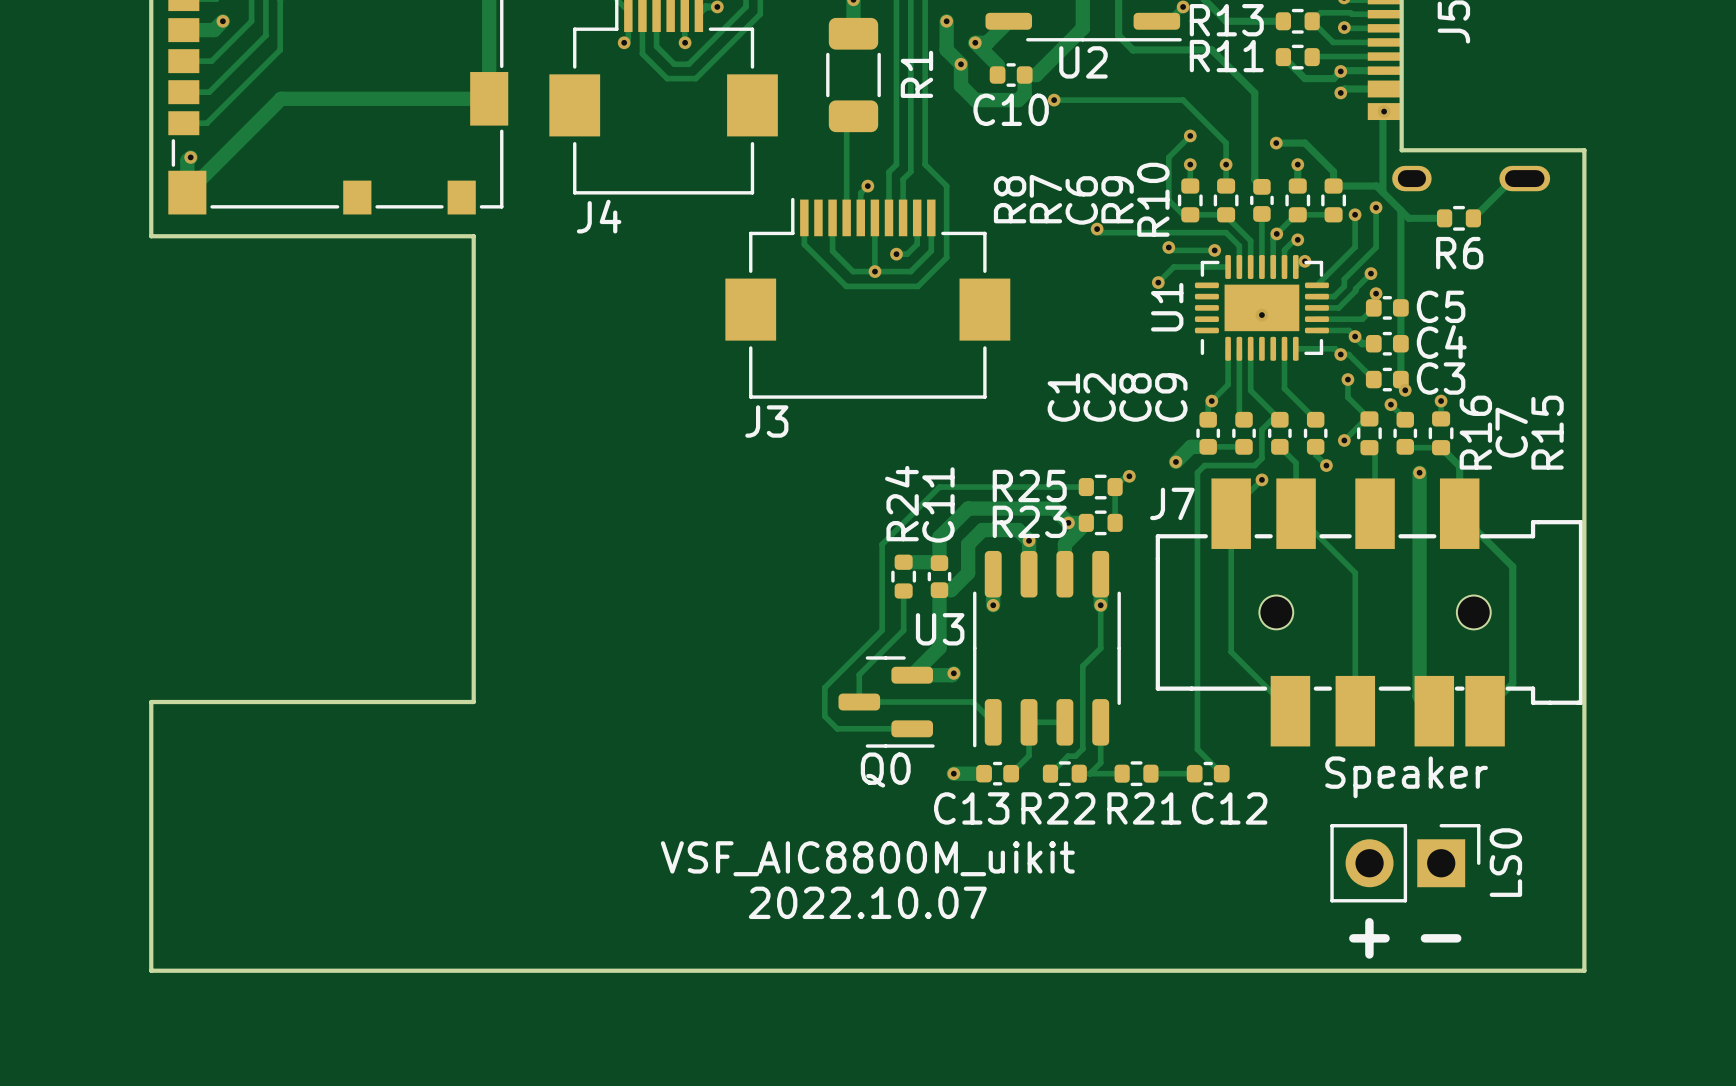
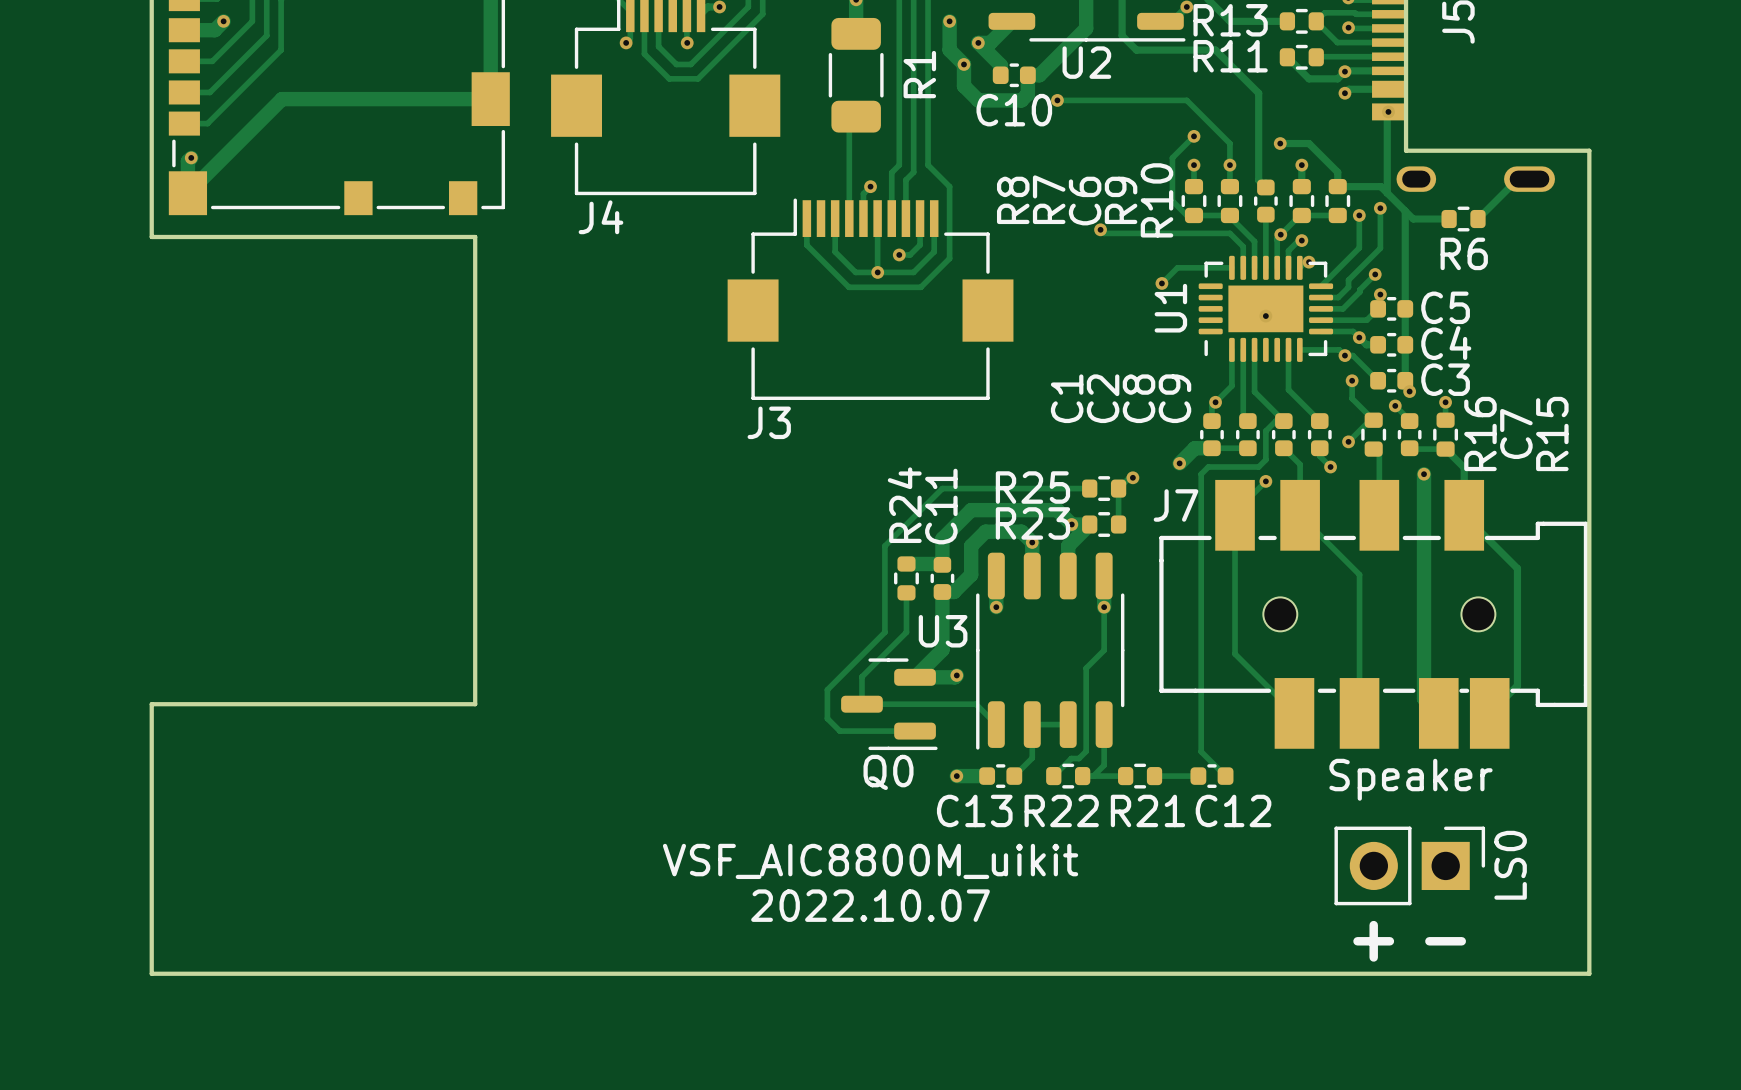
track: (1168, 247) (1171, 250) (1214, 250) -> none
via: (1168, 247) -> none
via: (1214, 250) -> none

